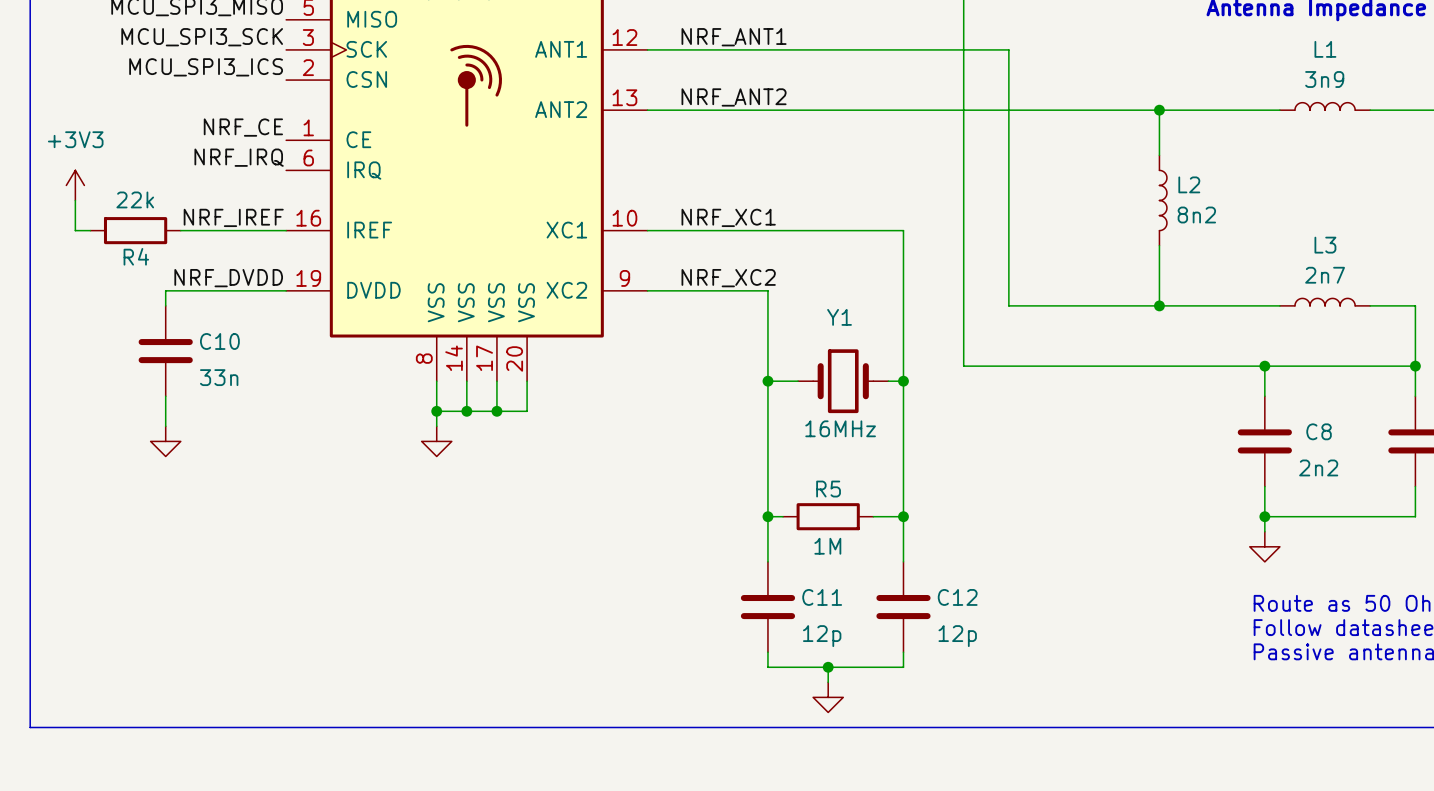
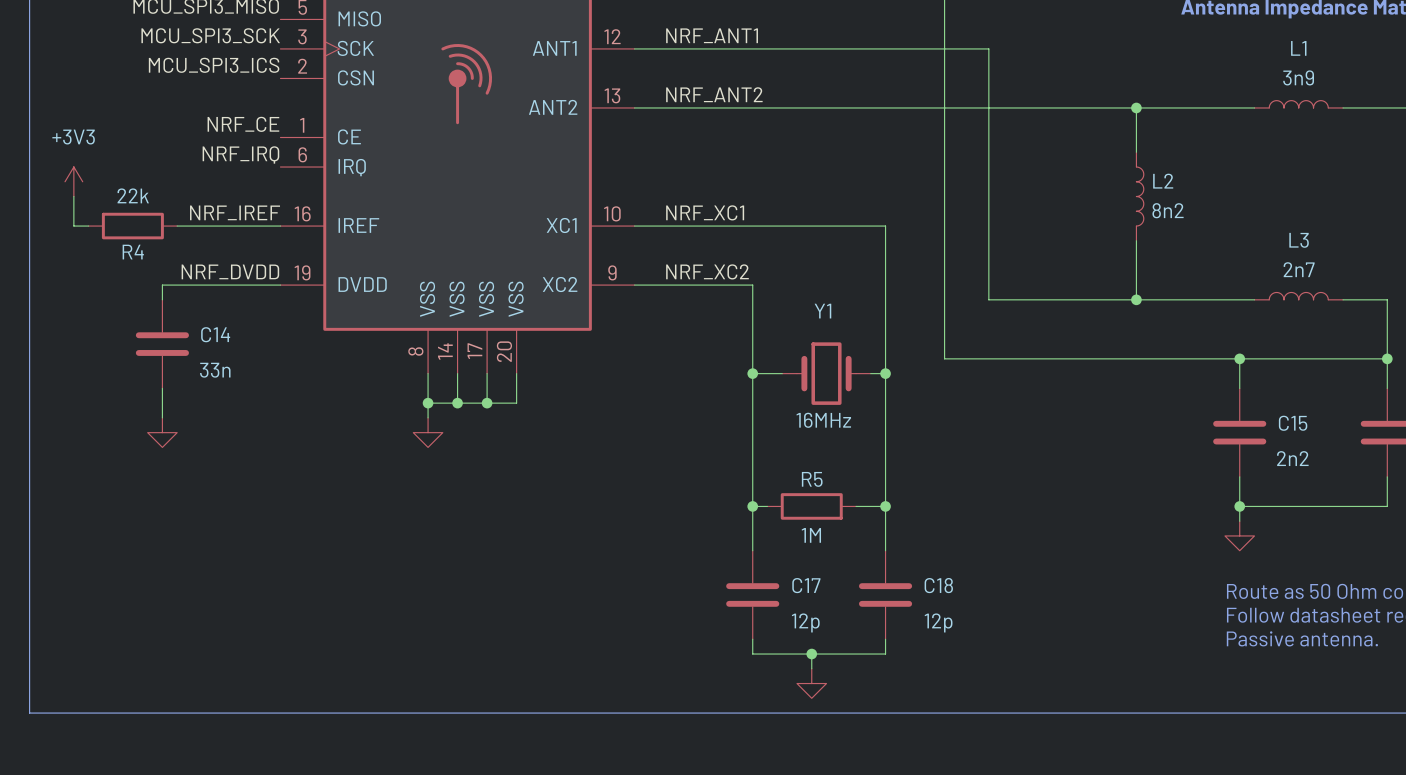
C10 name: C10 (219, 341) -> C14 (215, 334)
C8 name: C8 (1319, 431) -> C15 (1293, 423)
C11 name: C11 (822, 597) -> C17 (806, 585)
C12 name: C12 (957, 597) -> C18 (938, 585)

